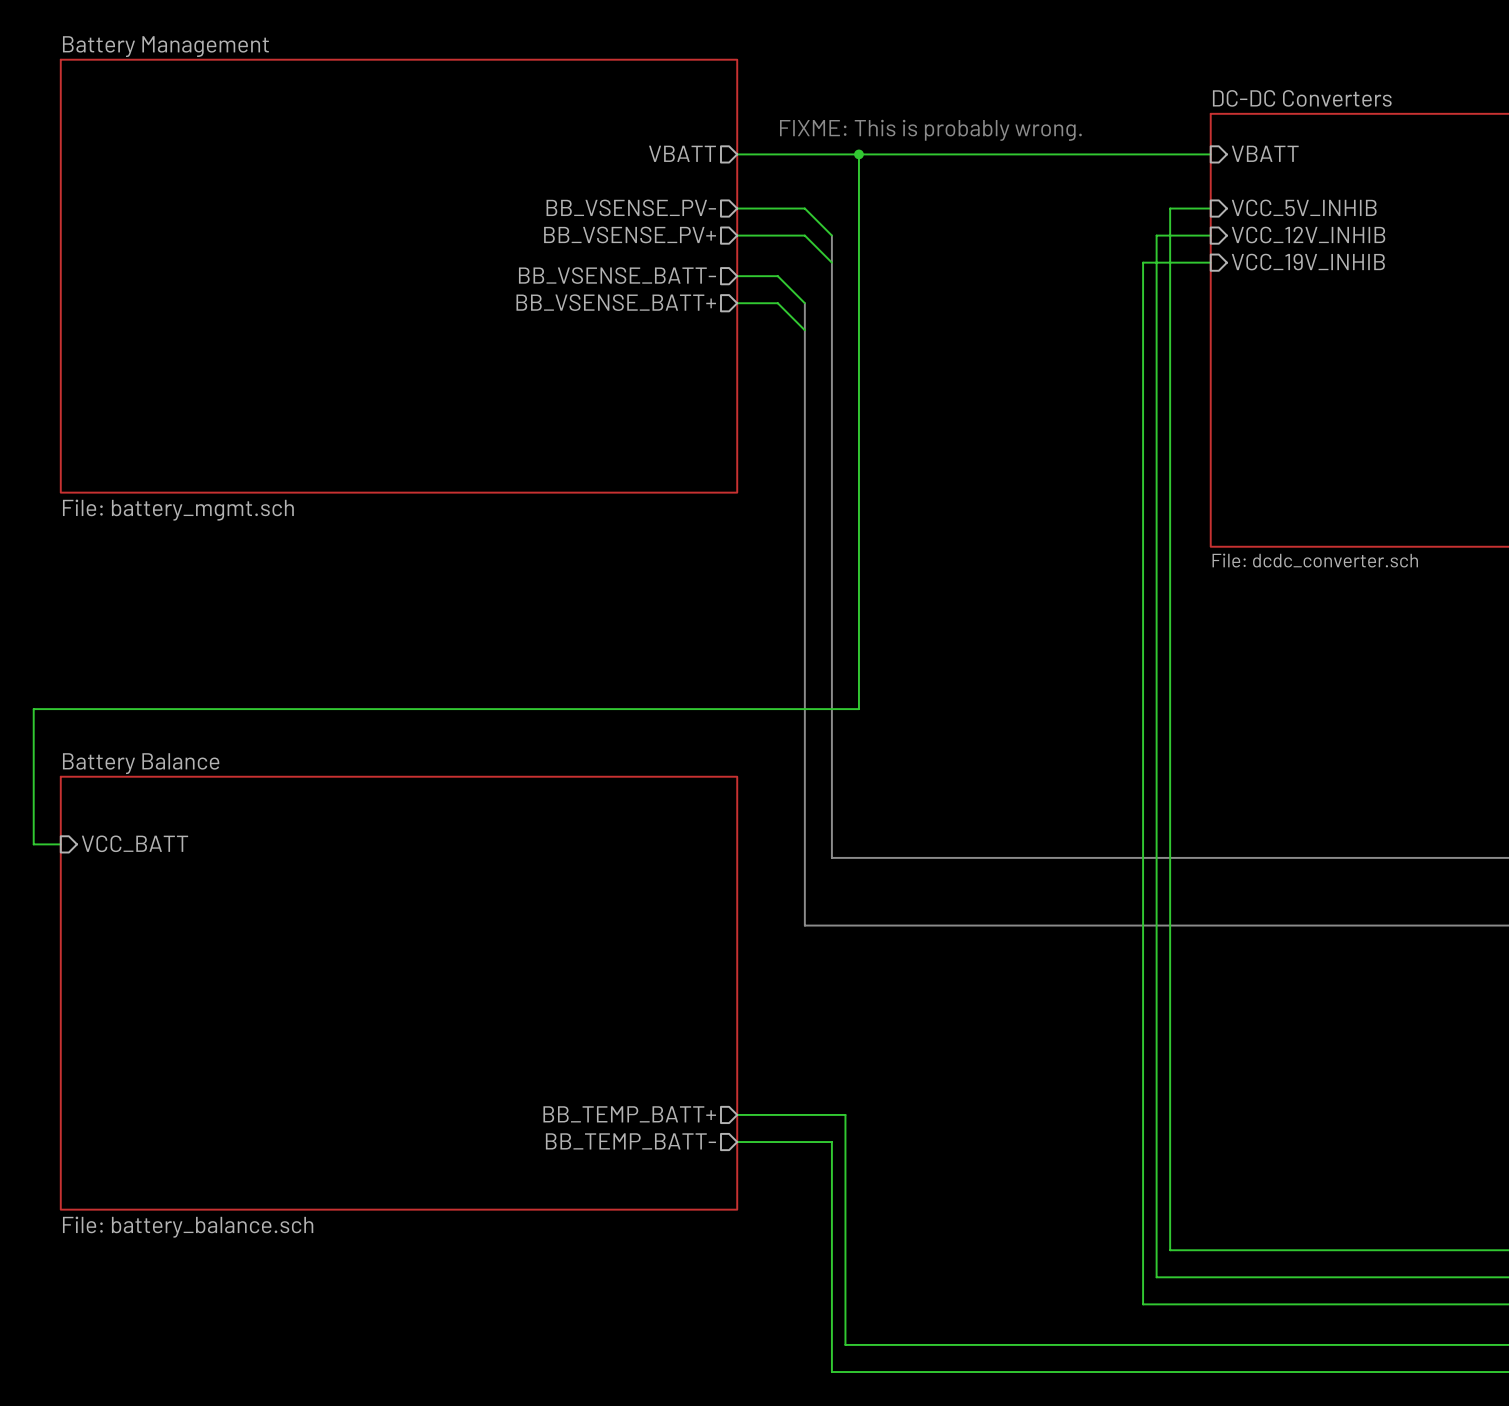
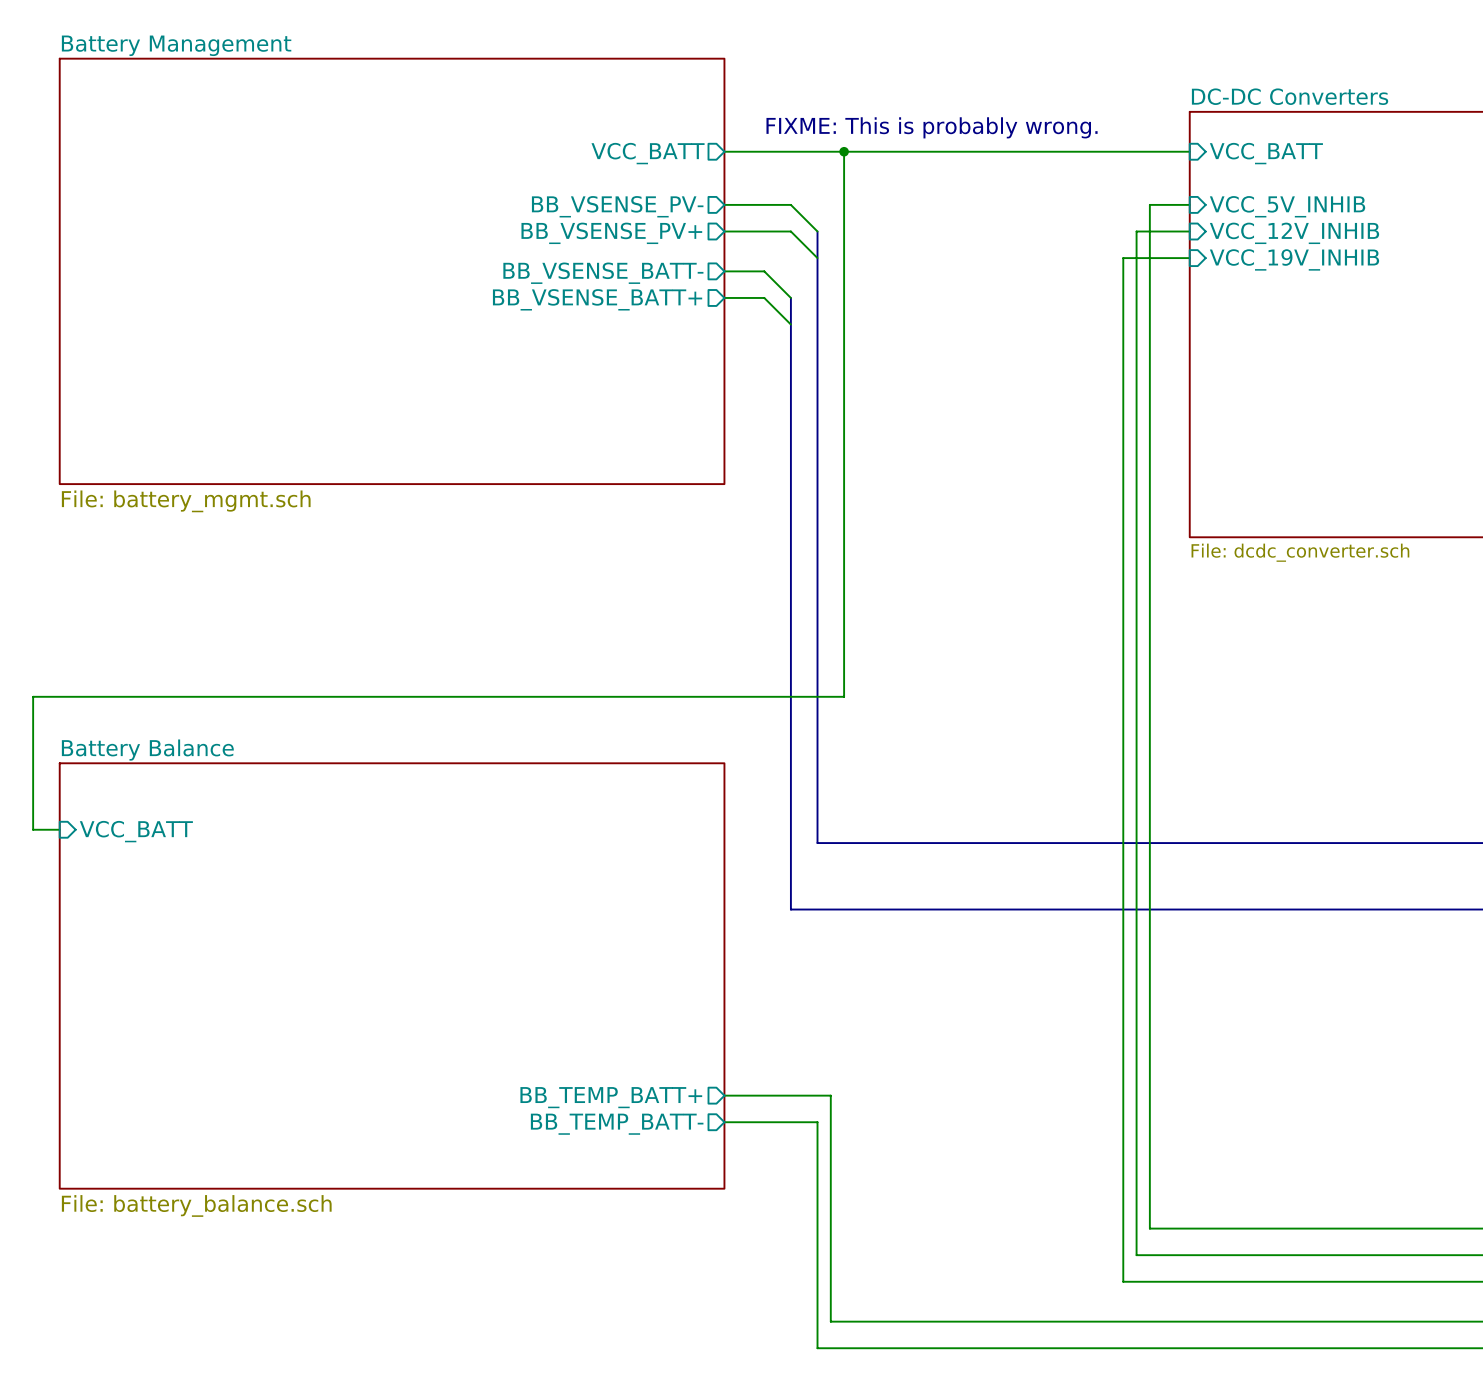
sheet pin: VBATT (682, 153) -> VCC_BATT (648, 153)
sheet pin: VBATT (1265, 153) -> VCC_BATT (1266, 153)

